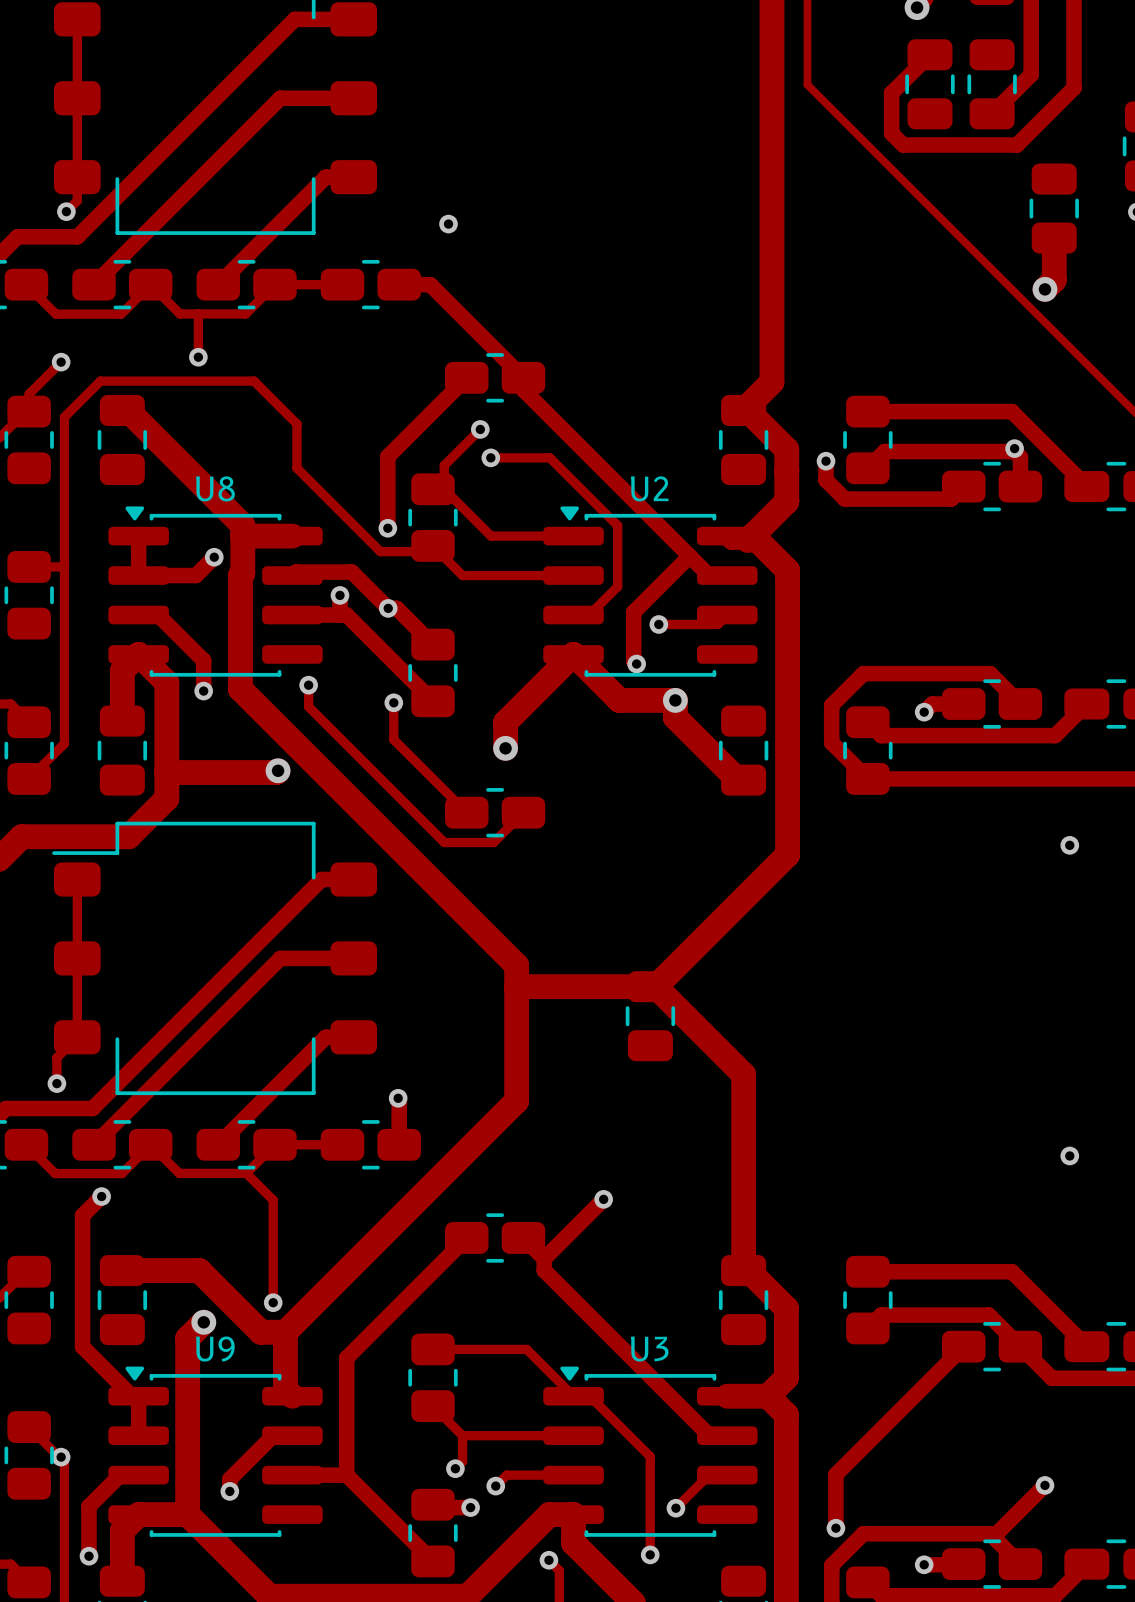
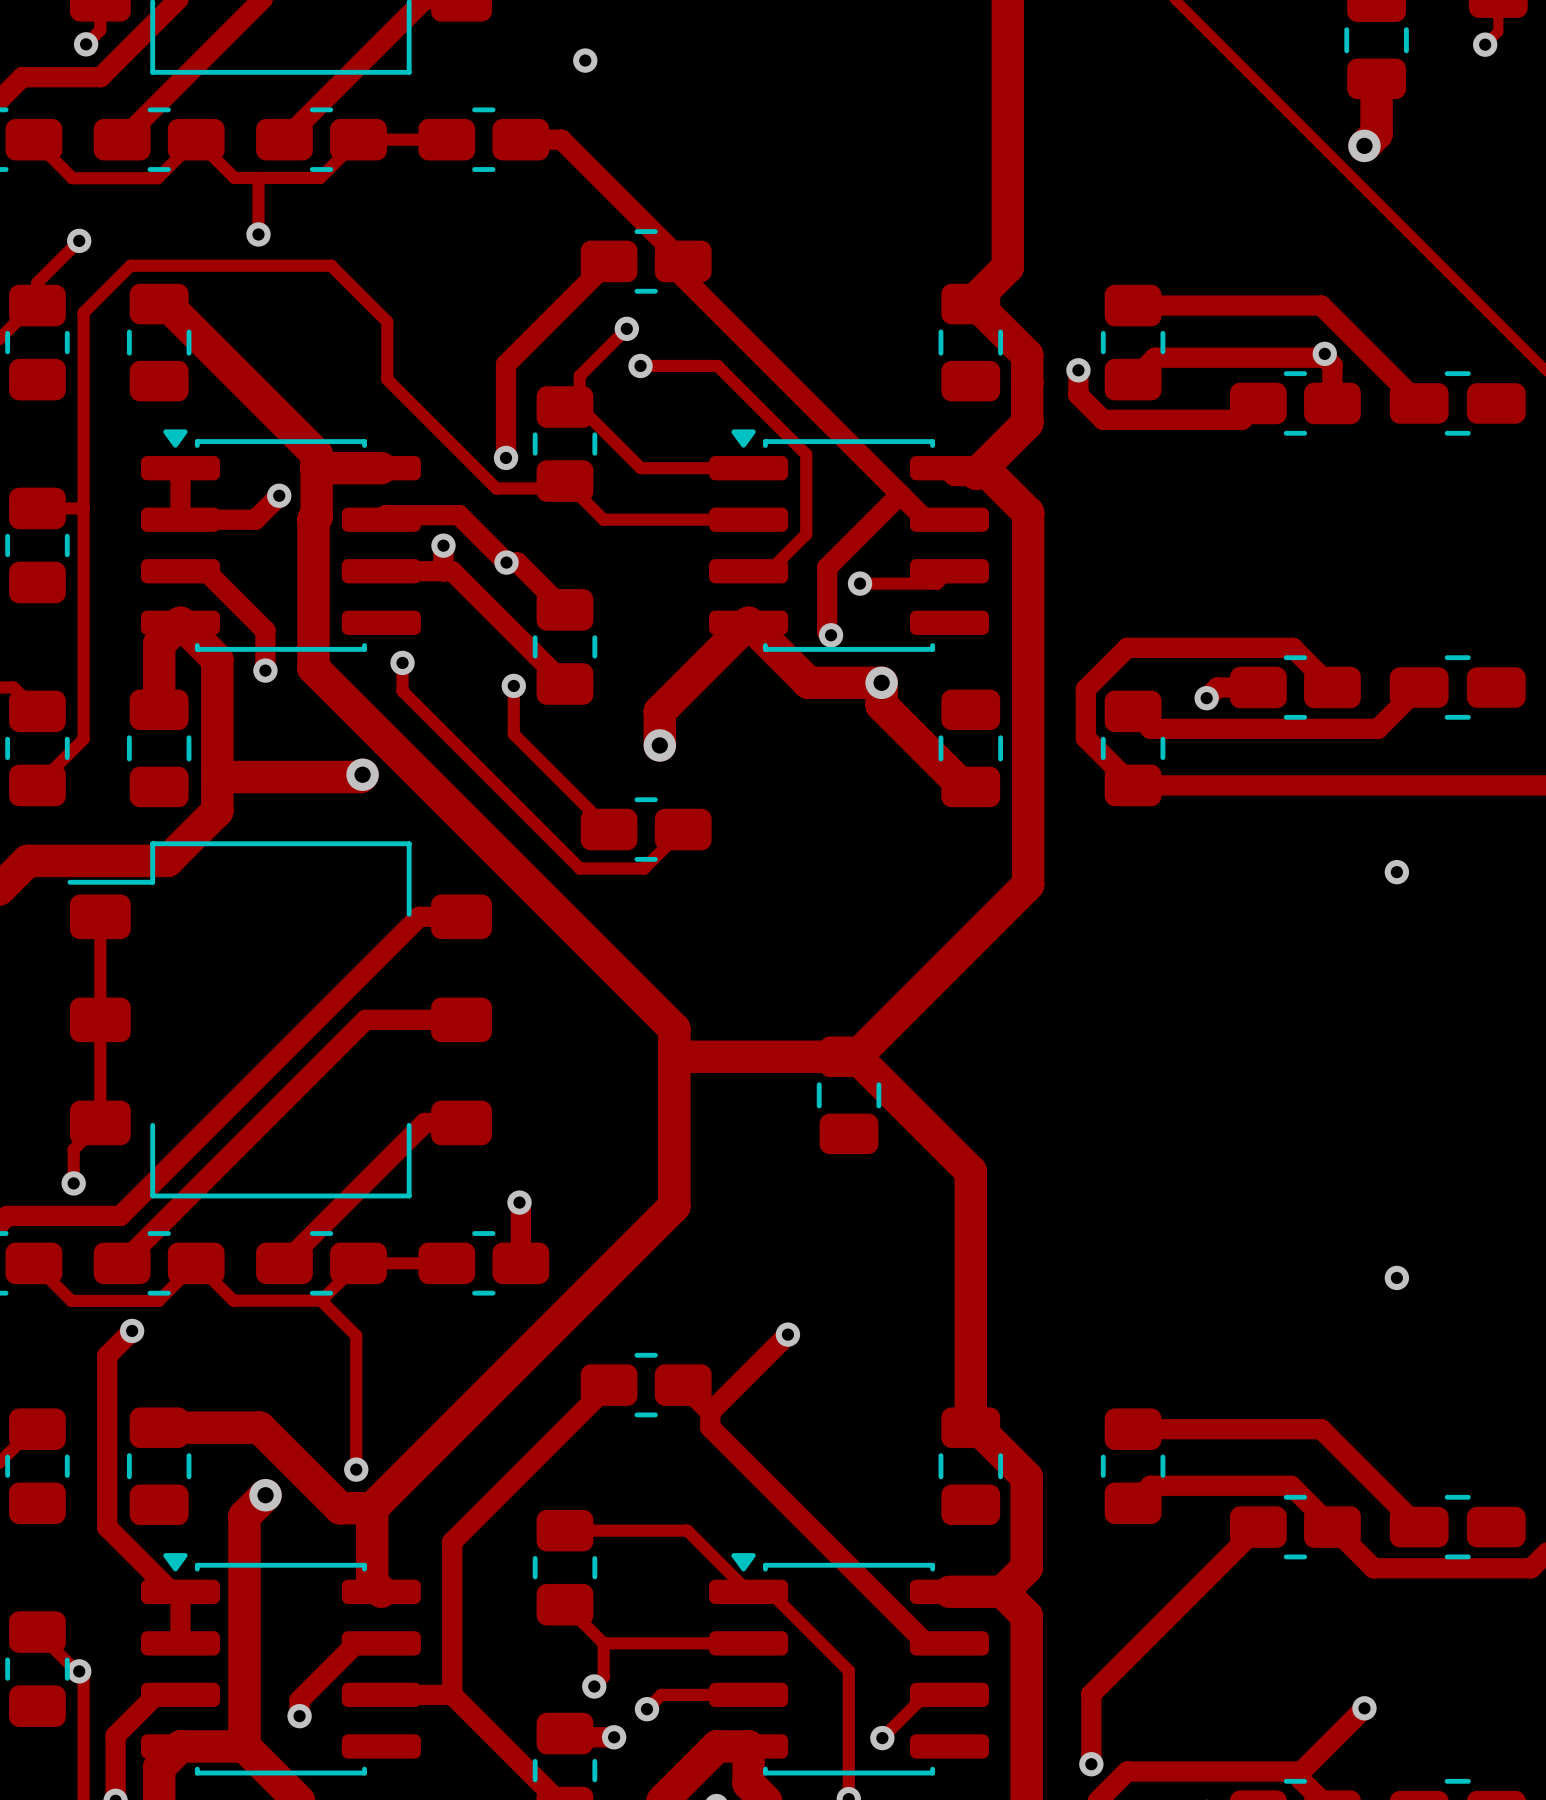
U8 name: U8 (215, 488) -> none
U2 name: U2 (649, 488) -> none
U9 name: U9 (215, 1349) -> none
U3 name: U3 (649, 1349) -> none

